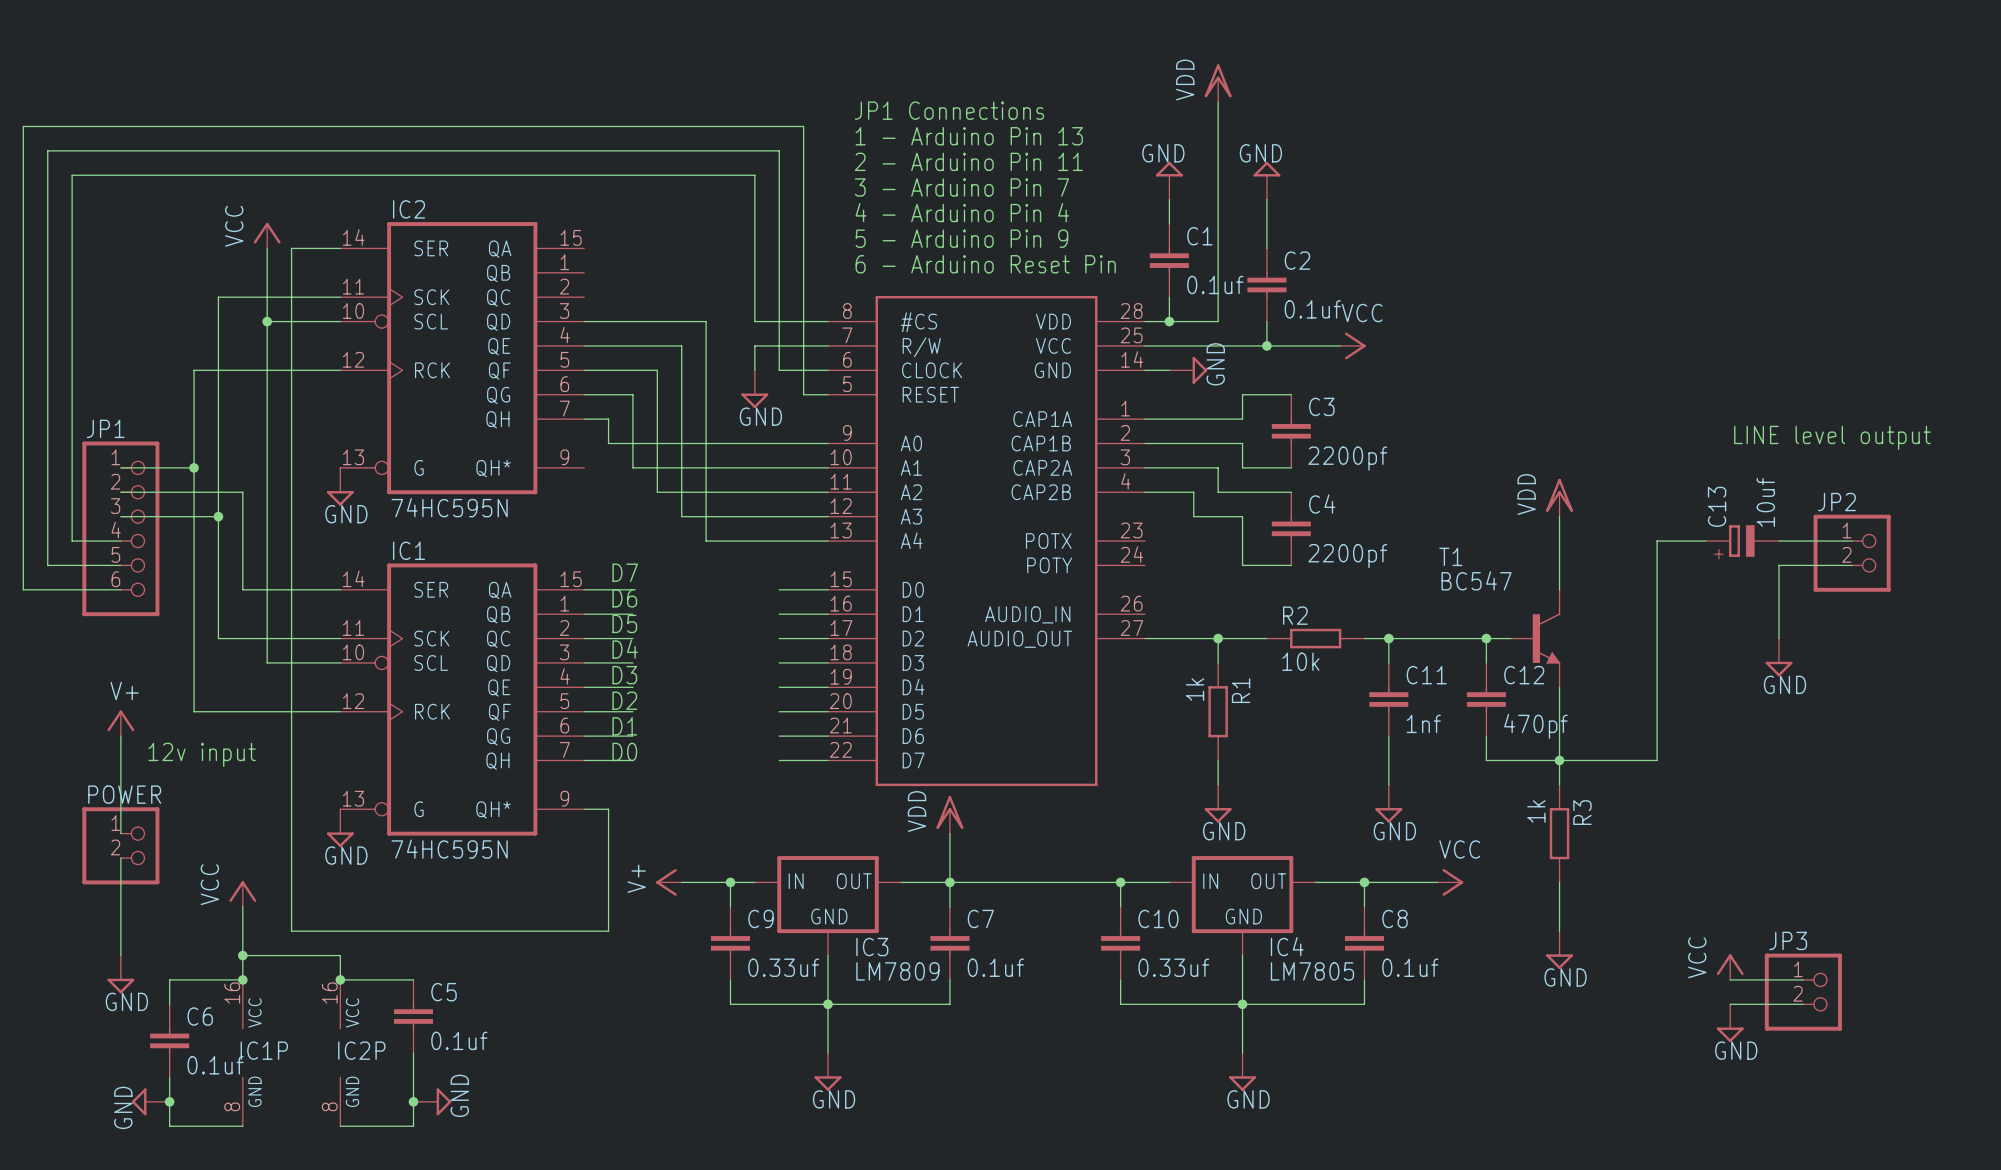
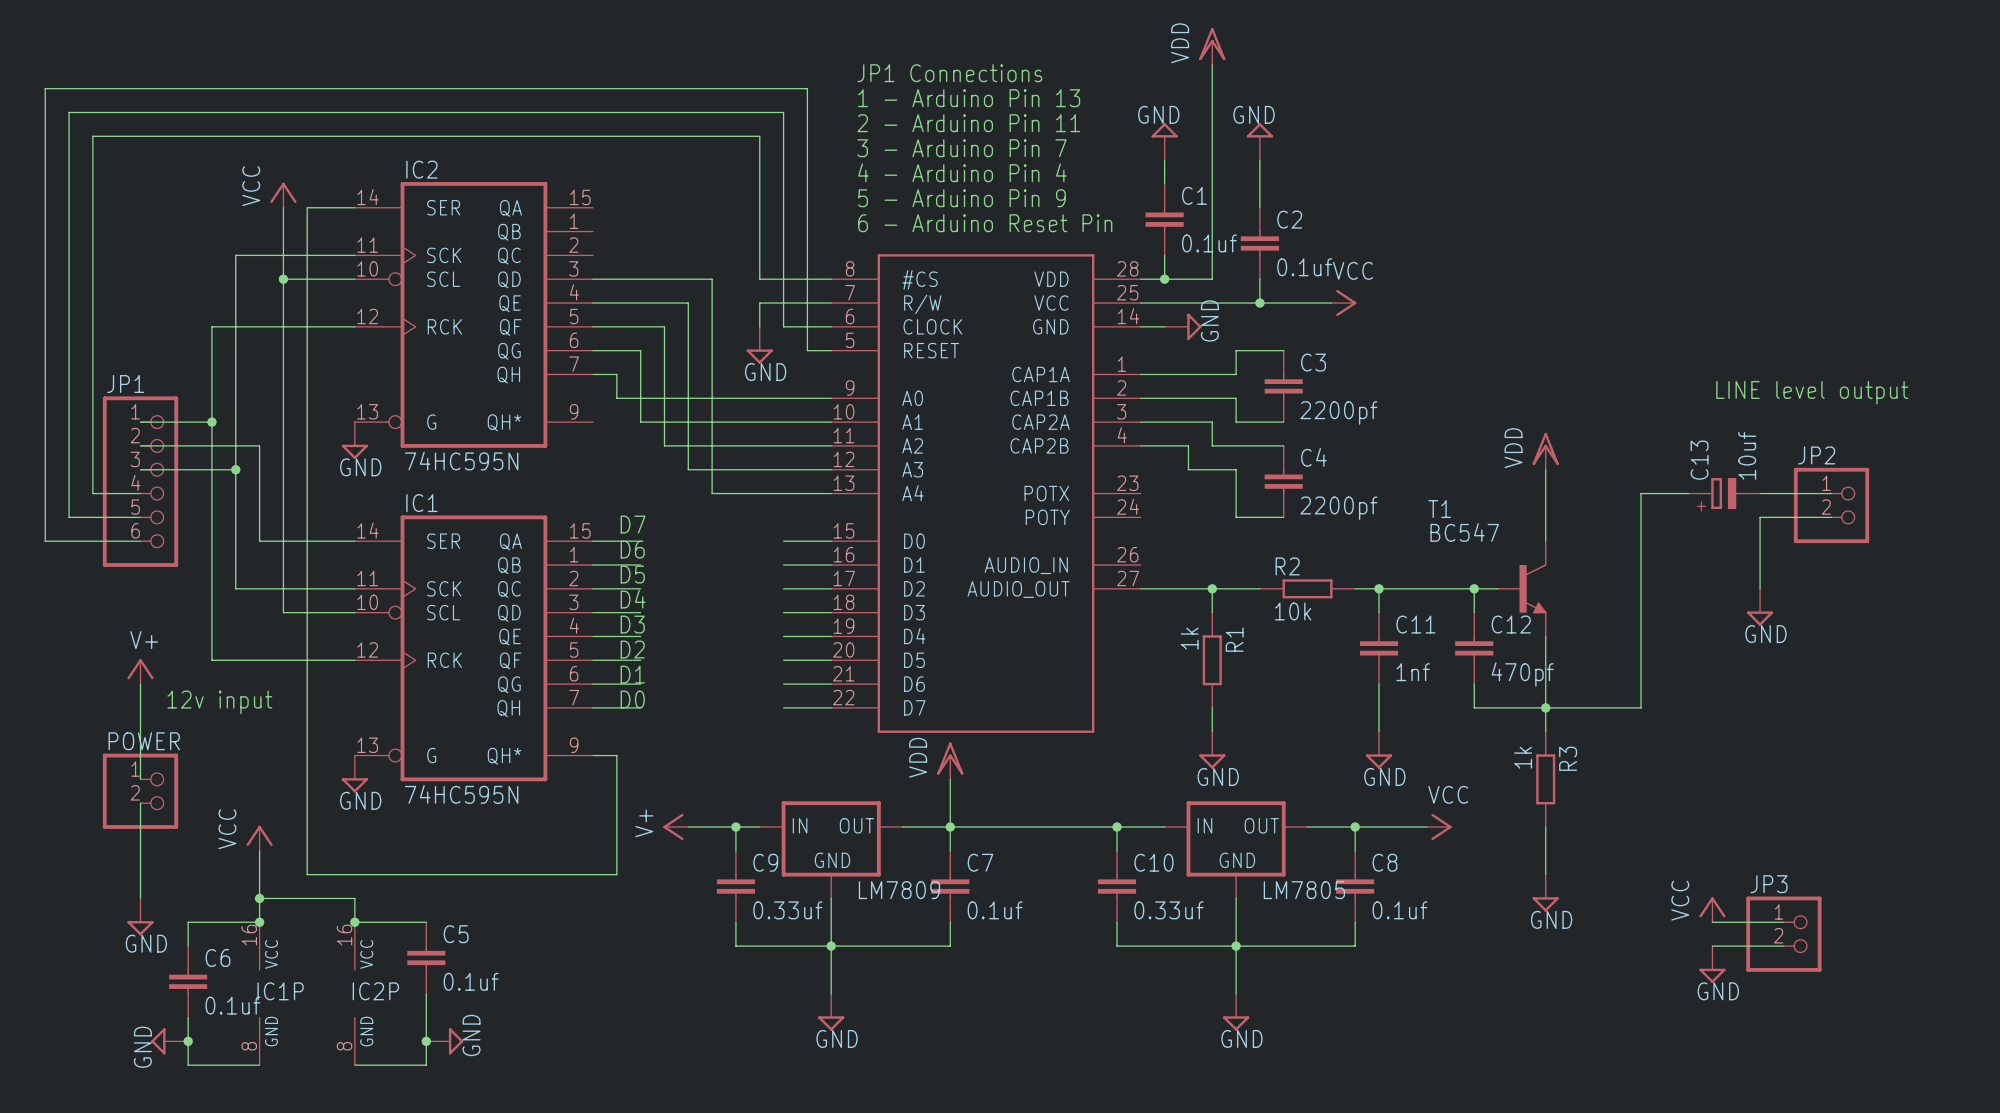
IC4 name: IC4 (1287, 946) -> LM7805 (1304, 890)
IC3 name: IC3 (872, 947) -> LM7809 (899, 890)
IC3 value: LM7809 (897, 971) -> none
IC4 value: LM7805 (1312, 971) -> none

